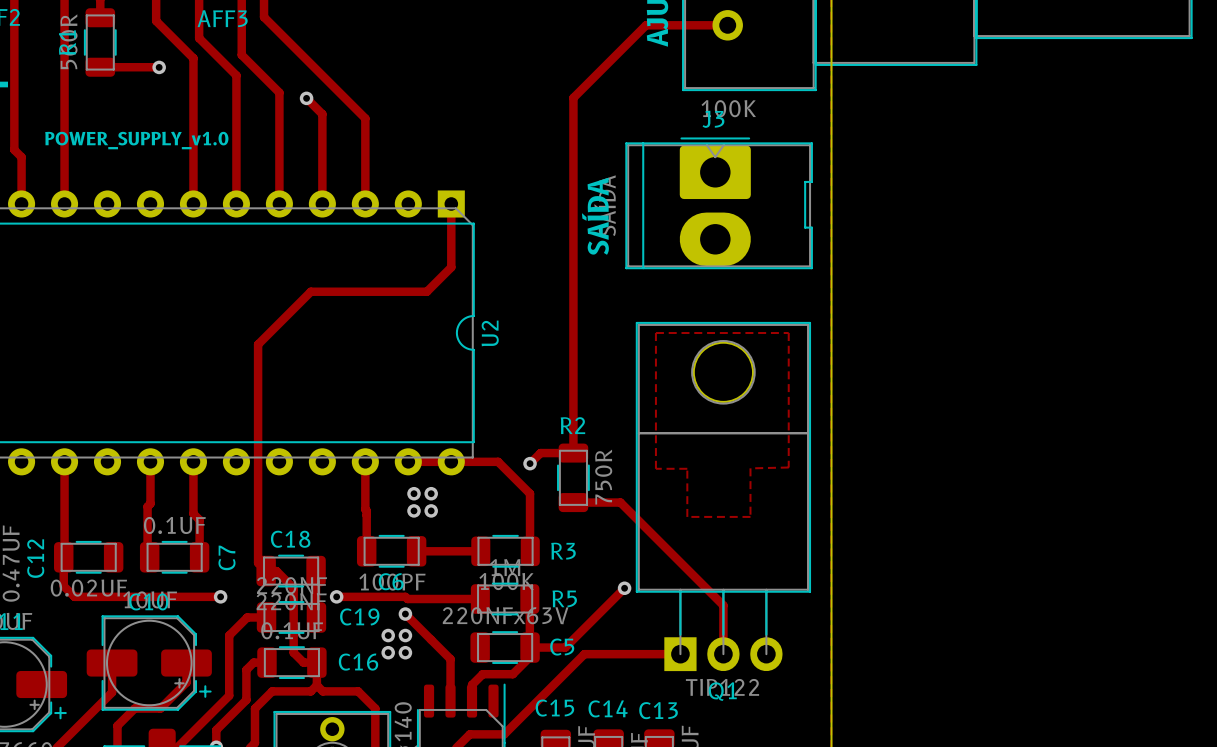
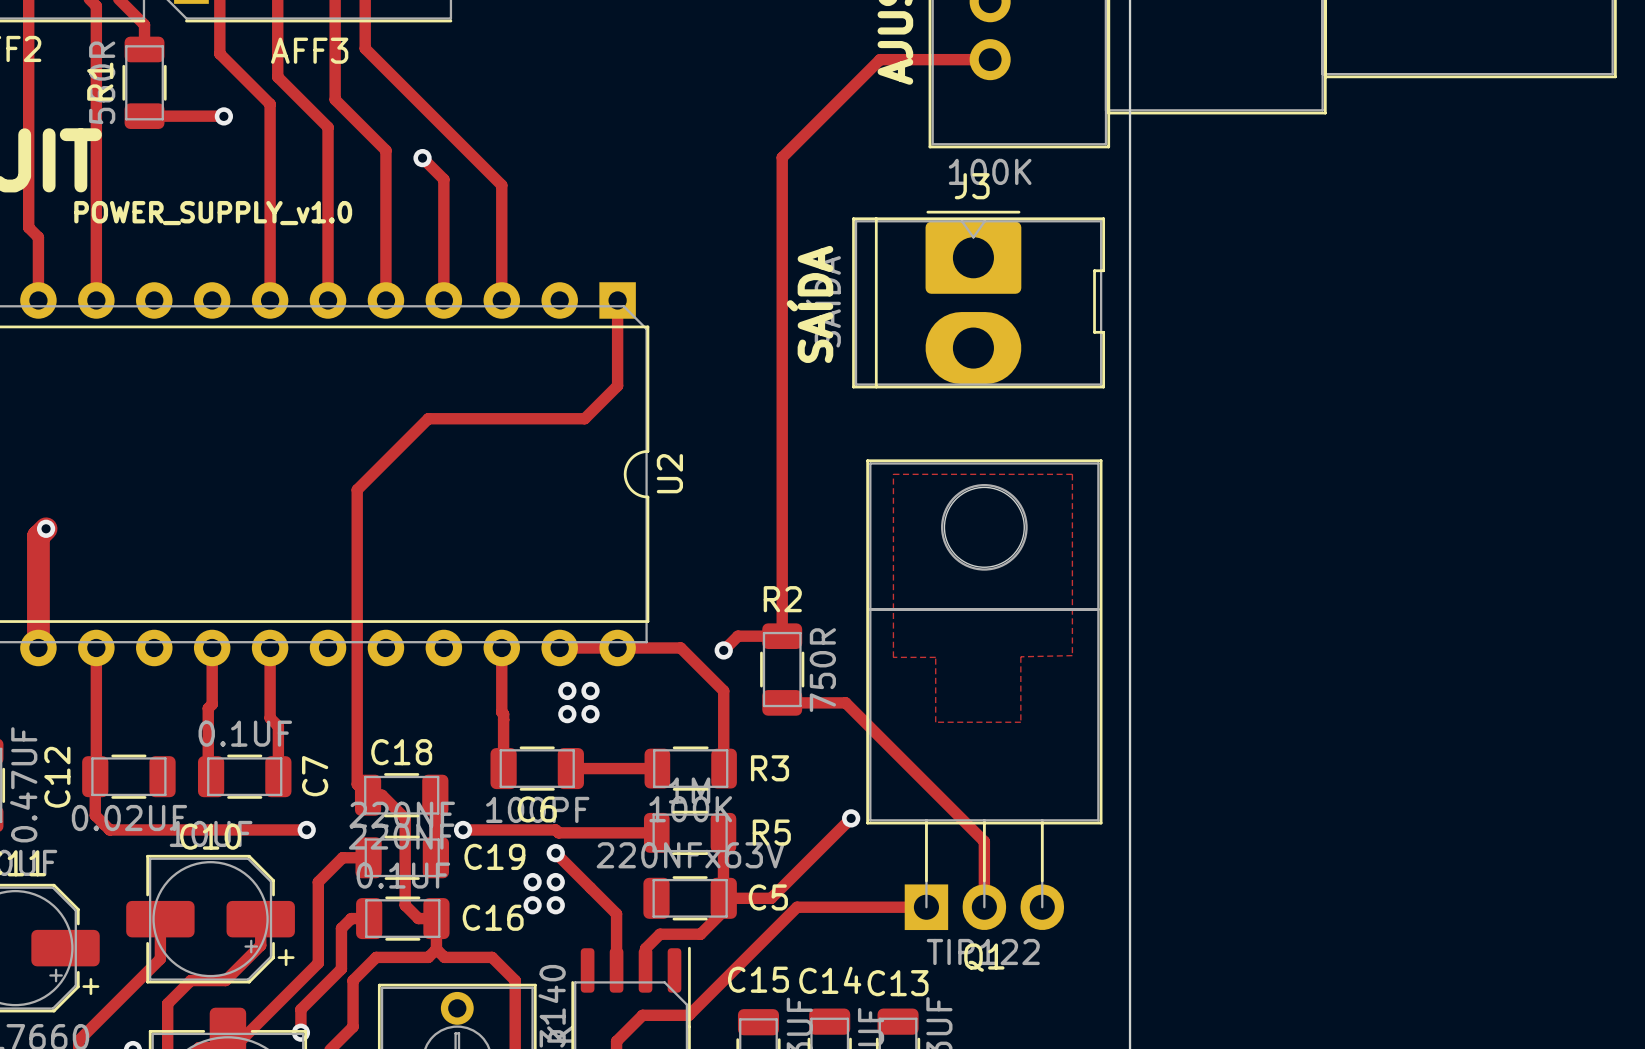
track: none -> (46, 528) (38, 536) (38, 647)
via: none -> (46, 528)

